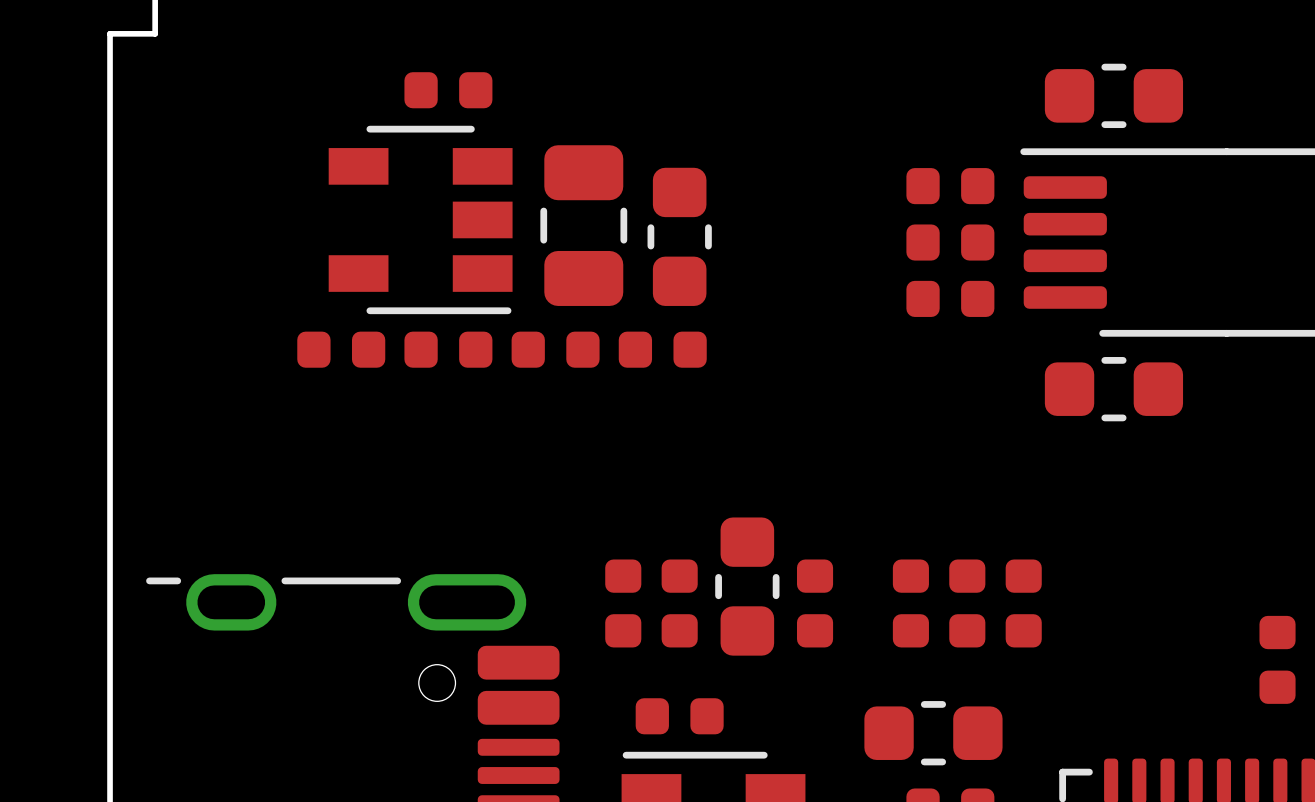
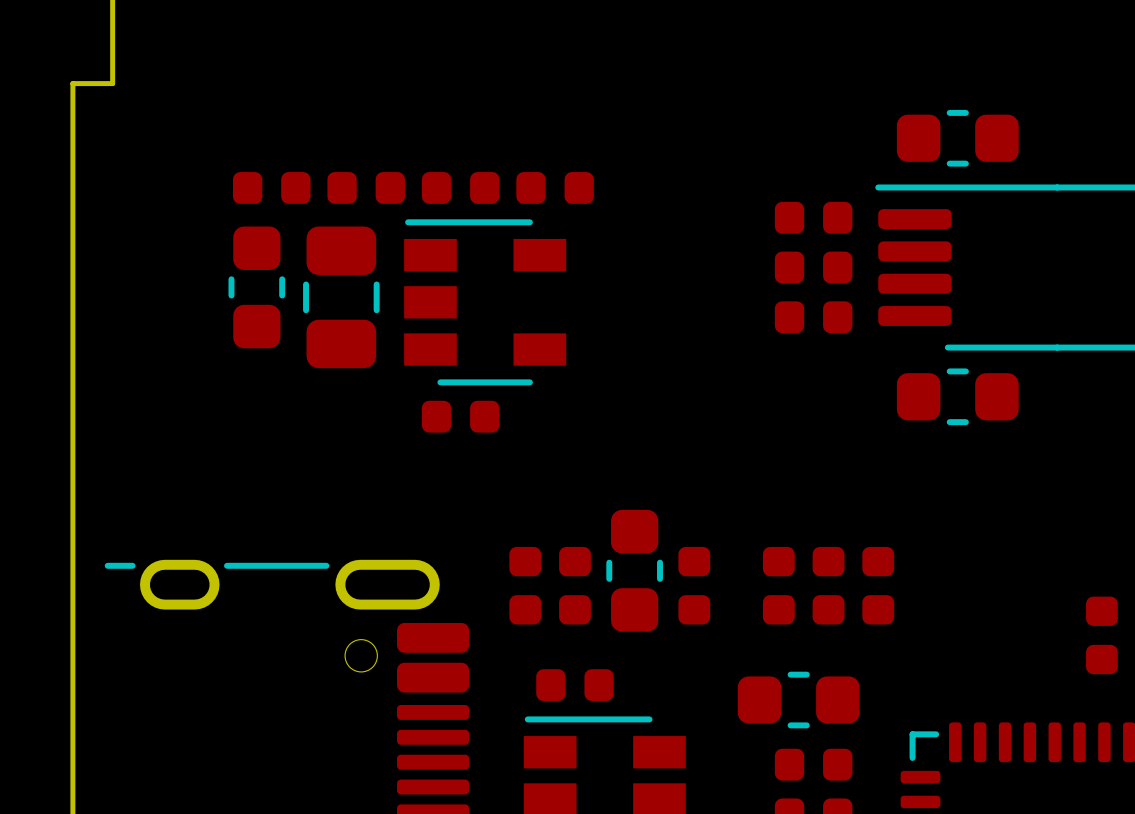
part: (448, 90) -> none
part: none -> (271, 187)
part: none -> (366, 187)
part: none -> (460, 187)
part: none -> (555, 187)
part rotation: 0° (420, 219) -> 180° (485, 302)
part position: (420, 219) -> (485, 302)
part position: (583, 225) -> (341, 297)
part position: (679, 236) -> (256, 287)
part: (341, 349) -> none
part: (448, 349) -> none
part: (555, 349) -> none
part: (662, 349) -> none
part: none -> (460, 416)

